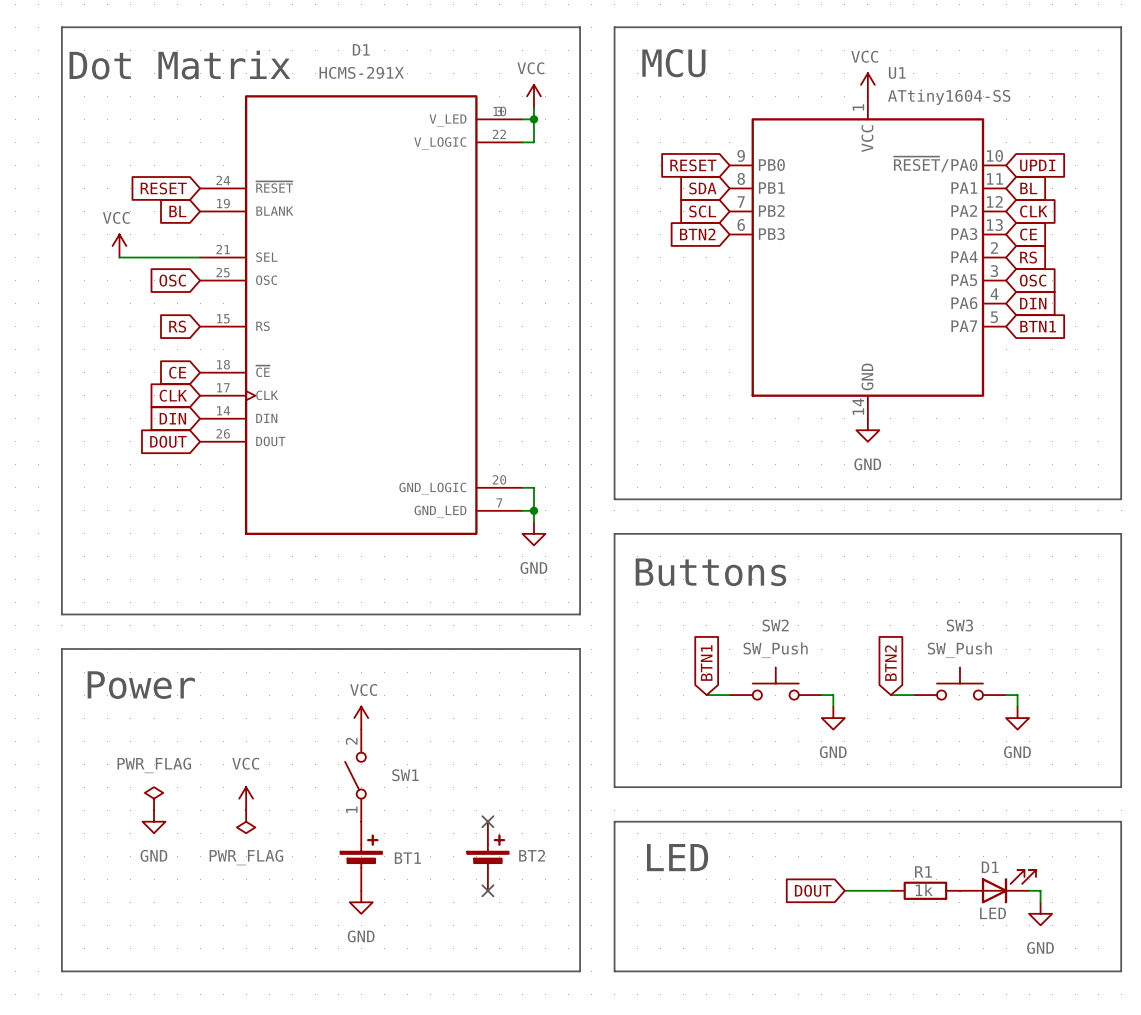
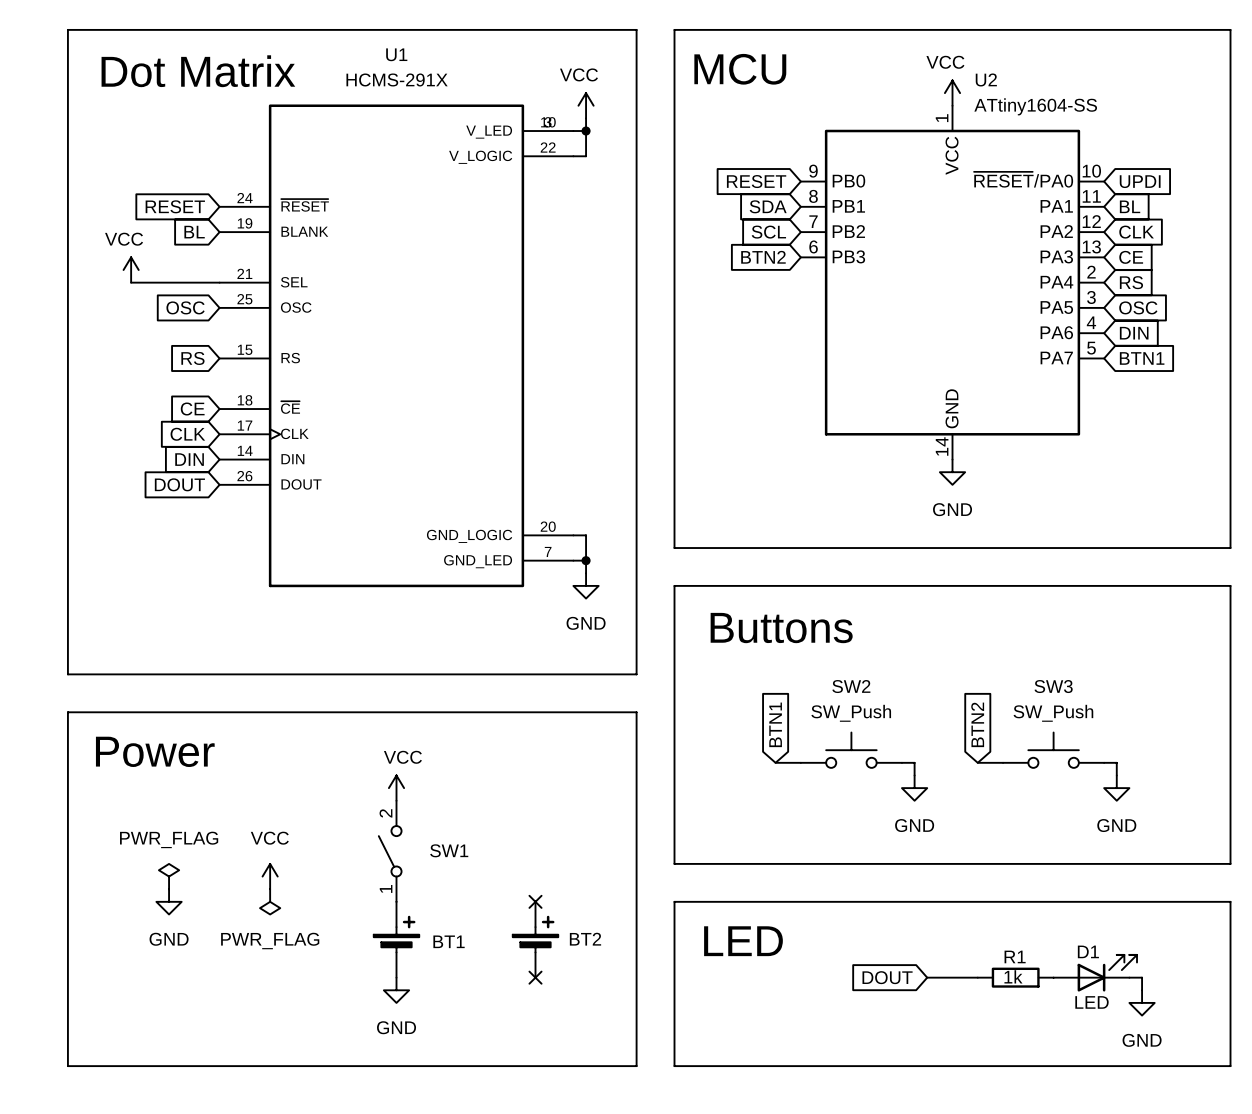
D1 name: D1 (361, 49) -> U1 (396, 54)
U1 name: U1 (897, 72) -> U2 (986, 79)

